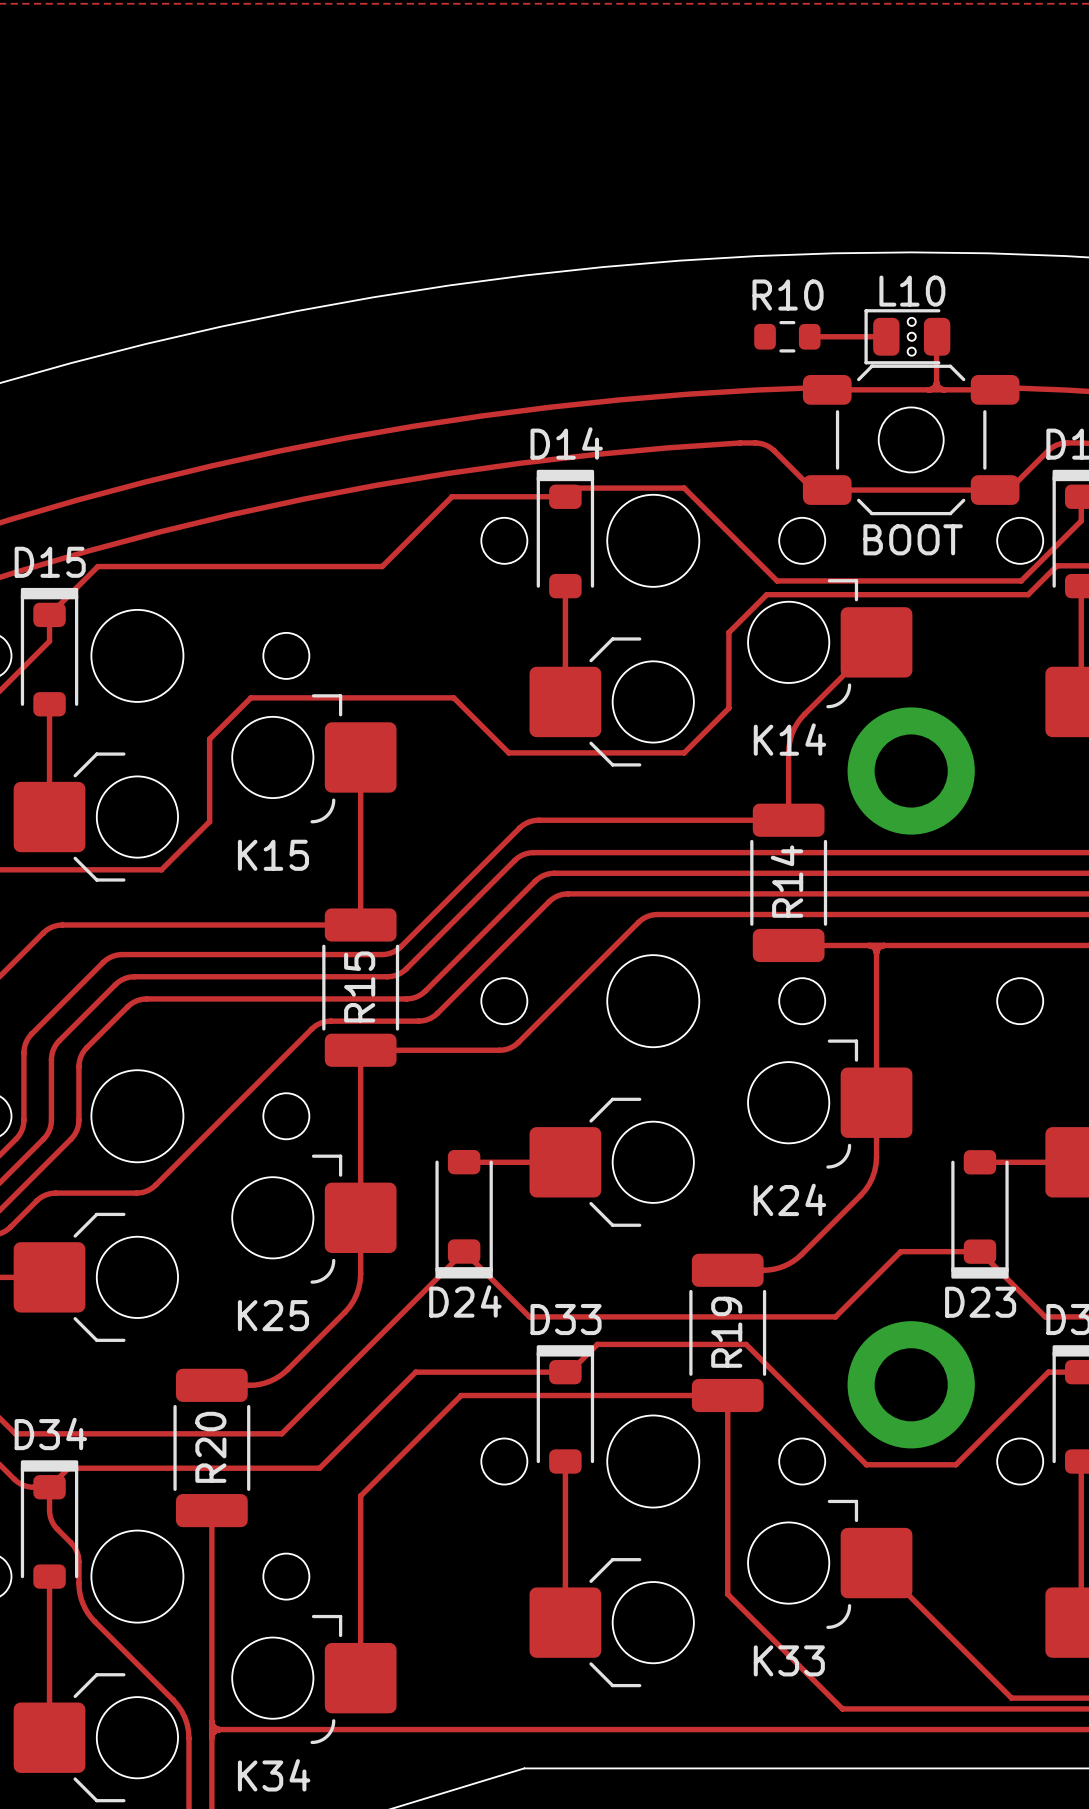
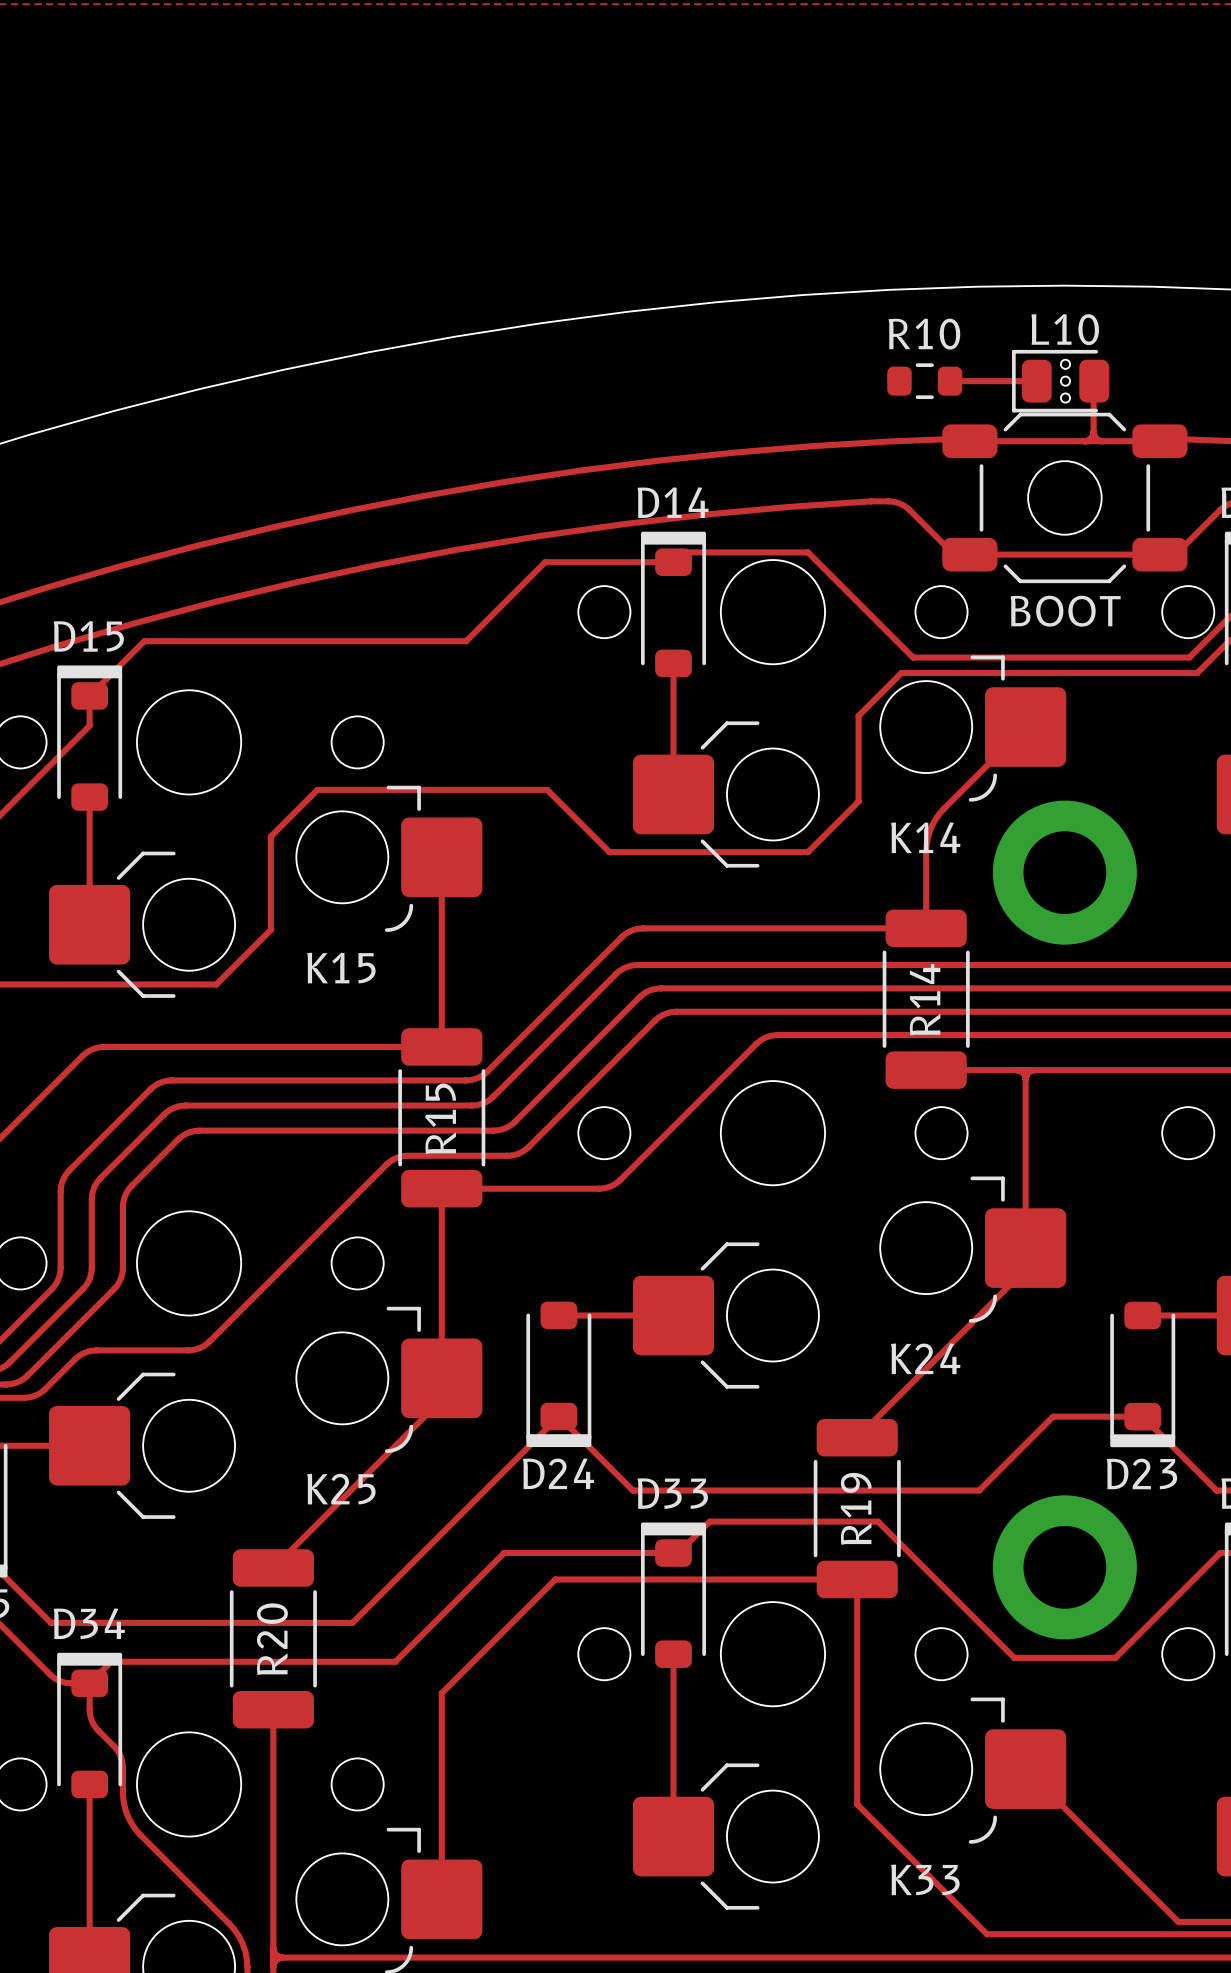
track: (876, 1121) (876, 1164) (869, 1184) (860, 1195) (801, 1254) (788, 1263) (774, 1269) (727, 1270) -> (1025, 1269) (857, 1437)
track: (360, 1236) (358, 1288) (353, 1301) (344, 1312) (287, 1369) (274, 1378) (254, 1385) (211, 1385) -> (441, 1399) (273, 1567)

